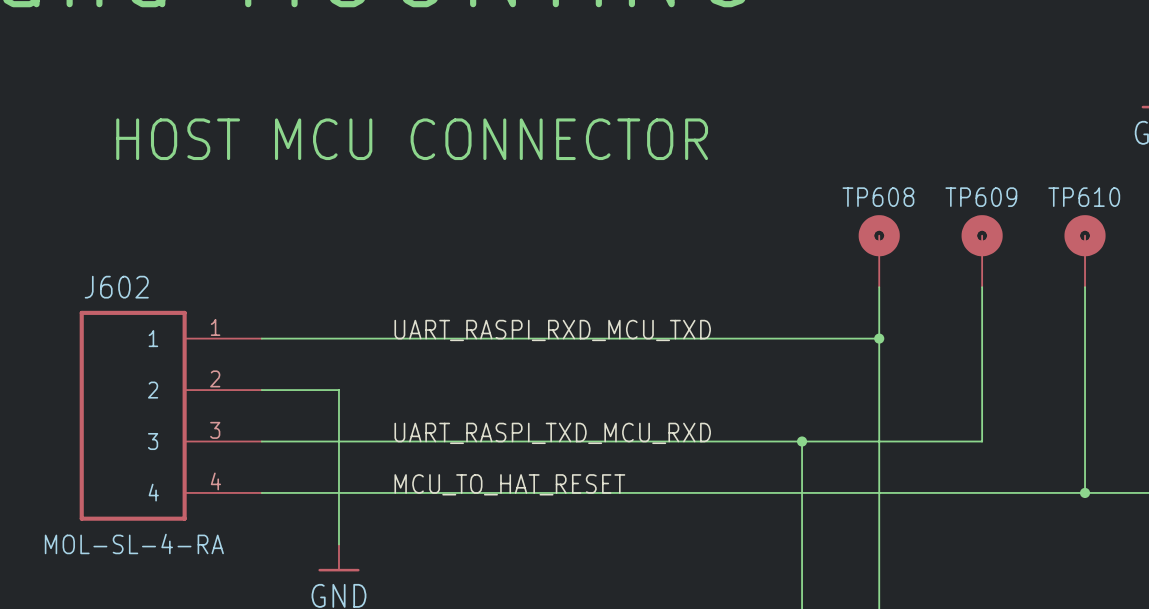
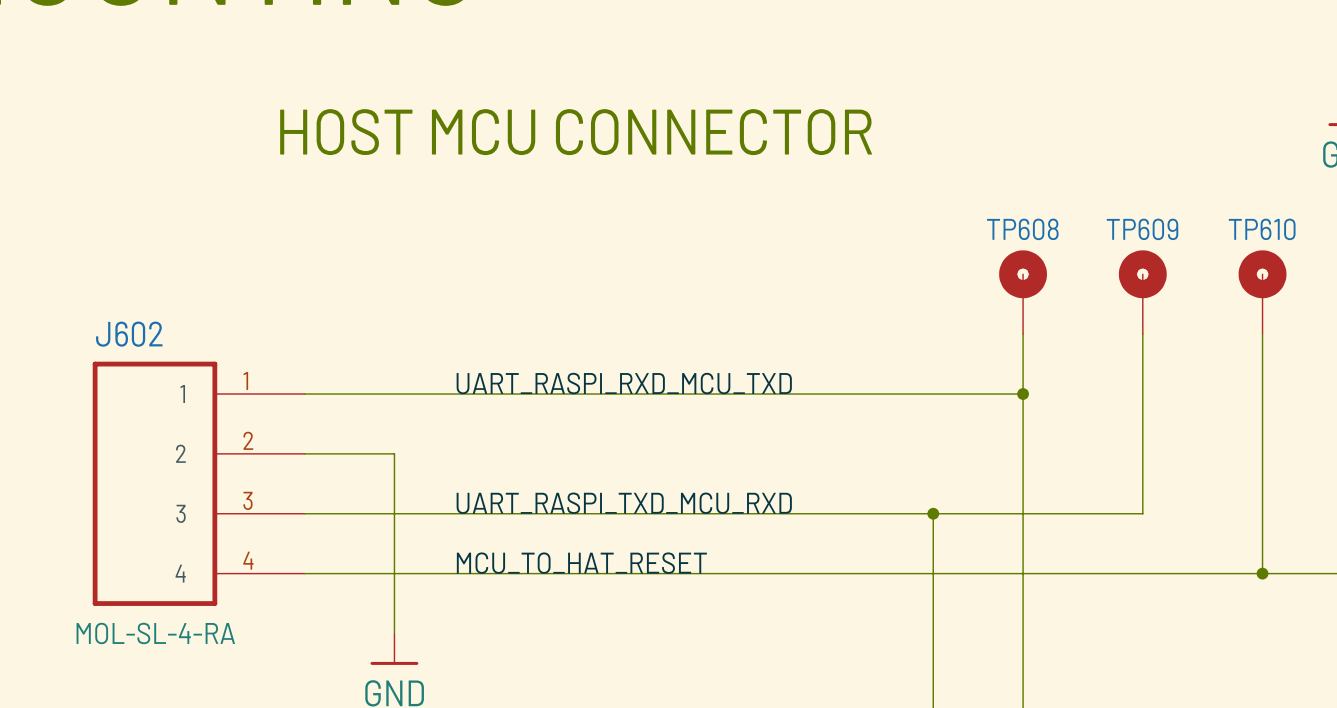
text position: HOST MCU CONNECTOR (412, 139) -> HOST MCU CONNECTOR (576, 132)

